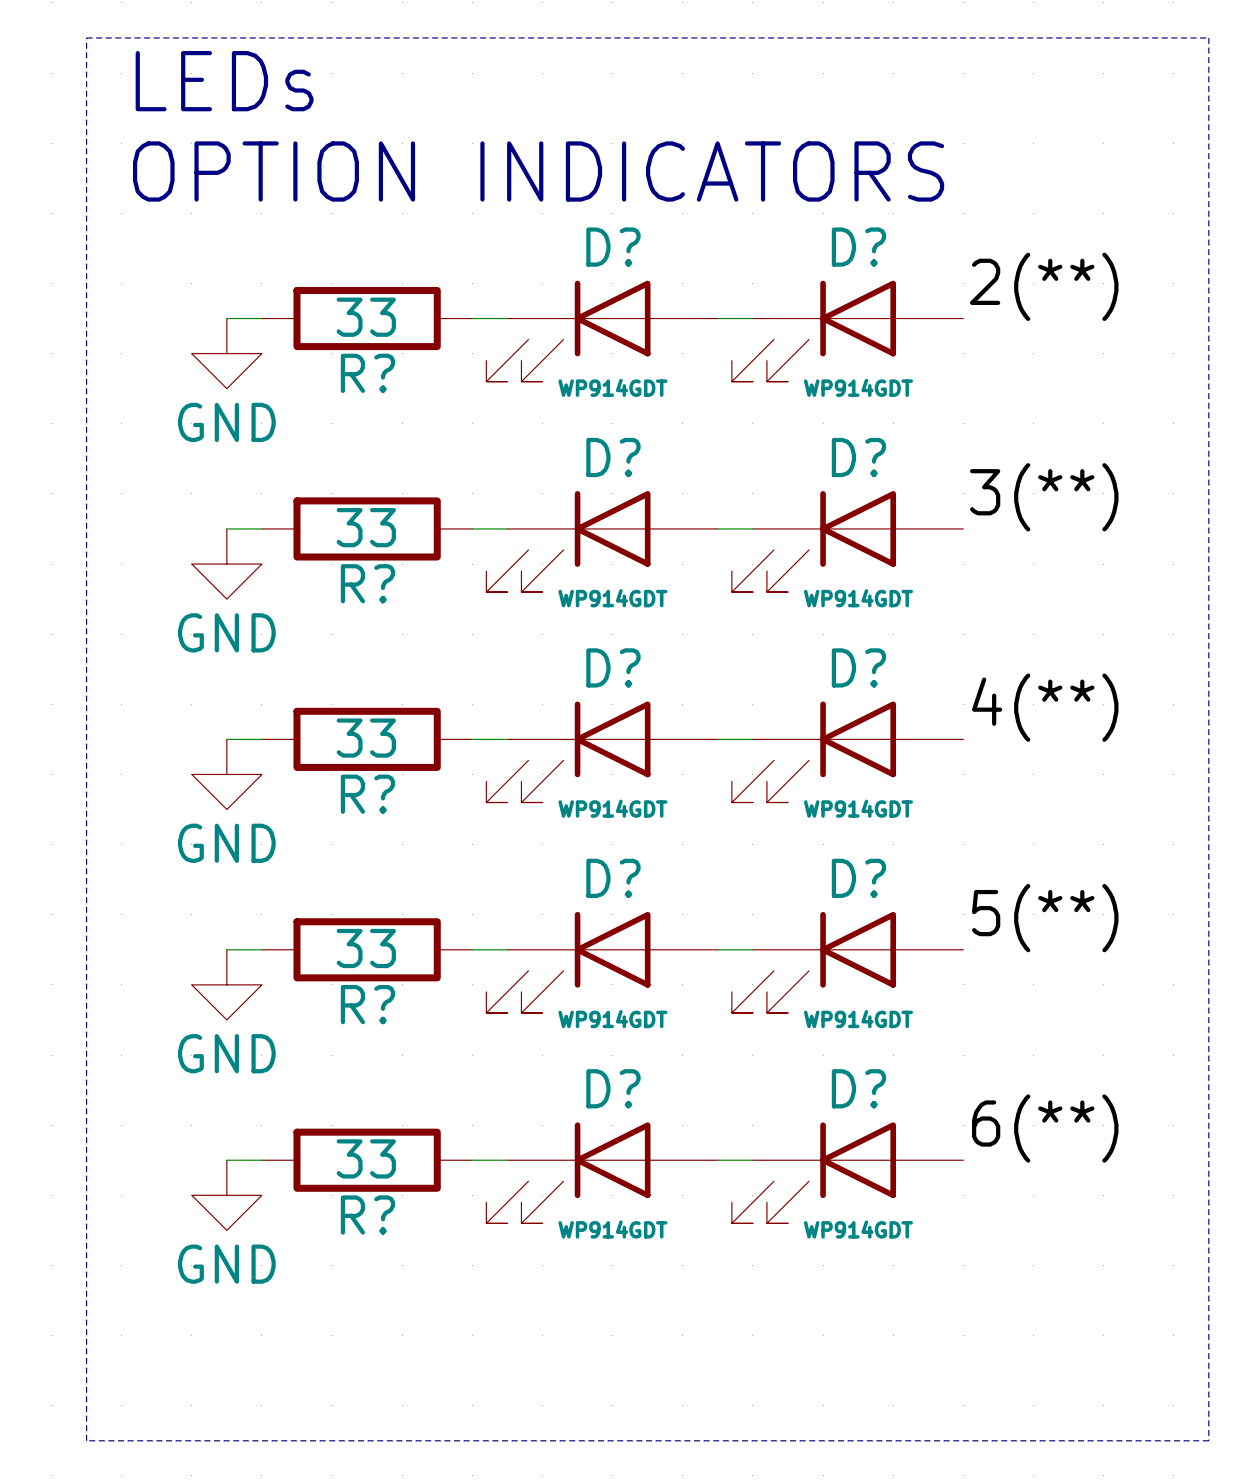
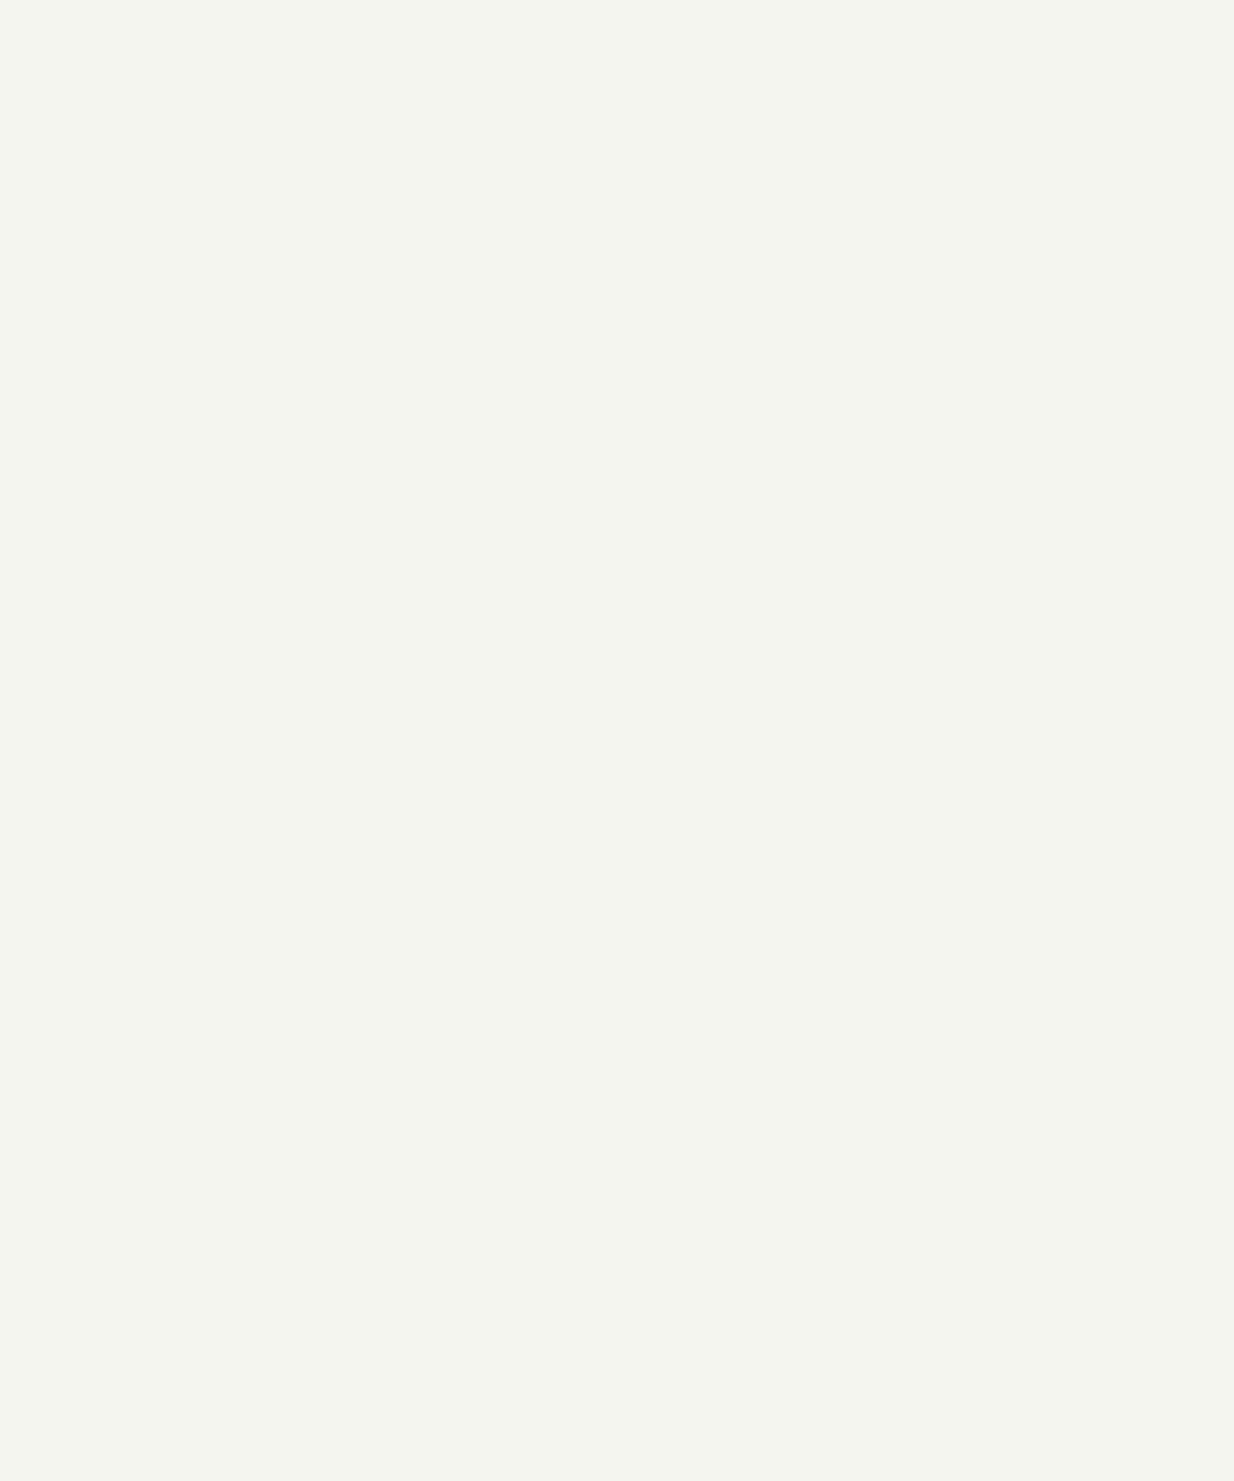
line: (86, 37) (86, 1440) (1208, 1440) (1208, 37) (86, 37) -> none
text: LEDs (224, 81) -> none
text: OPTION INDICATORS (538, 171) -> none
label: 2(**) (1044, 286) -> none
wire: (226, 318) (261, 318) -> none
R?: 33 (367, 318) -> none
wire: (472, 318) (507, 318) -> none
wire: (717, 318) (752, 318) -> none
D?: WP914GDT (602, 331) -> none
D?: WP914GDT (847, 331) -> none
power symbol: GND (226, 353) -> none
label: 3(**) (1044, 497) -> none
wire: (226, 528) (261, 528) -> none
R?: 33 (367, 528) -> none
wire: (472, 528) (507, 528) -> none
wire: (717, 528) (752, 528) -> none
D?: WP914GDT (602, 541) -> none
D?: WP914GDT (847, 541) -> none
power symbol: GND (226, 564) -> none
label: 4(**) (1045, 707) -> none
wire: (226, 739) (261, 739) -> none
R?: 33 (367, 739) -> none
wire: (472, 739) (507, 739) -> none
wire: (717, 739) (752, 739) -> none
D?: WP914GDT (602, 752) -> none
D?: WP914GDT (847, 752) -> none
power symbol: GND (226, 774) -> none
label: 5(**) (1045, 918) -> none
wire: (226, 949) (261, 949) -> none
R?: 33 (367, 949) -> none
wire: (472, 949) (507, 949) -> none
wire: (717, 949) (752, 949) -> none
D?: WP914GDT (602, 962) -> none
D?: WP914GDT (847, 962) -> none
power symbol: GND (226, 984) -> none
label: 6(**) (1045, 1128) -> none
wire: (226, 1160) (261, 1160) -> none
R?: 33 (367, 1160) -> none
wire: (472, 1160) (507, 1160) -> none
wire: (717, 1160) (752, 1160) -> none
D?: WP914GDT (602, 1172) -> none
D?: WP914GDT (847, 1172) -> none
power symbol: GND (226, 1195) -> none

